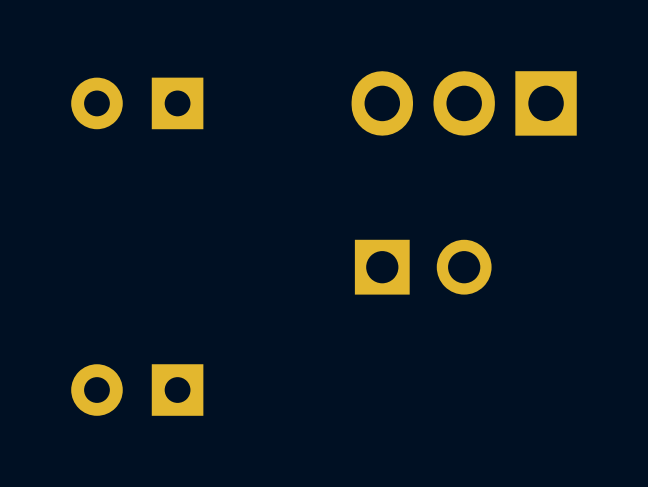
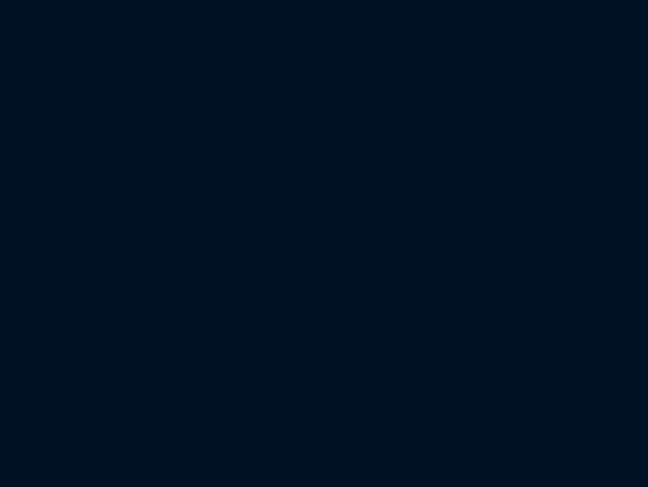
part: (137, 103) -> none
part: (464, 103) -> none
part: (423, 267) -> none
part: (137, 390) -> none

